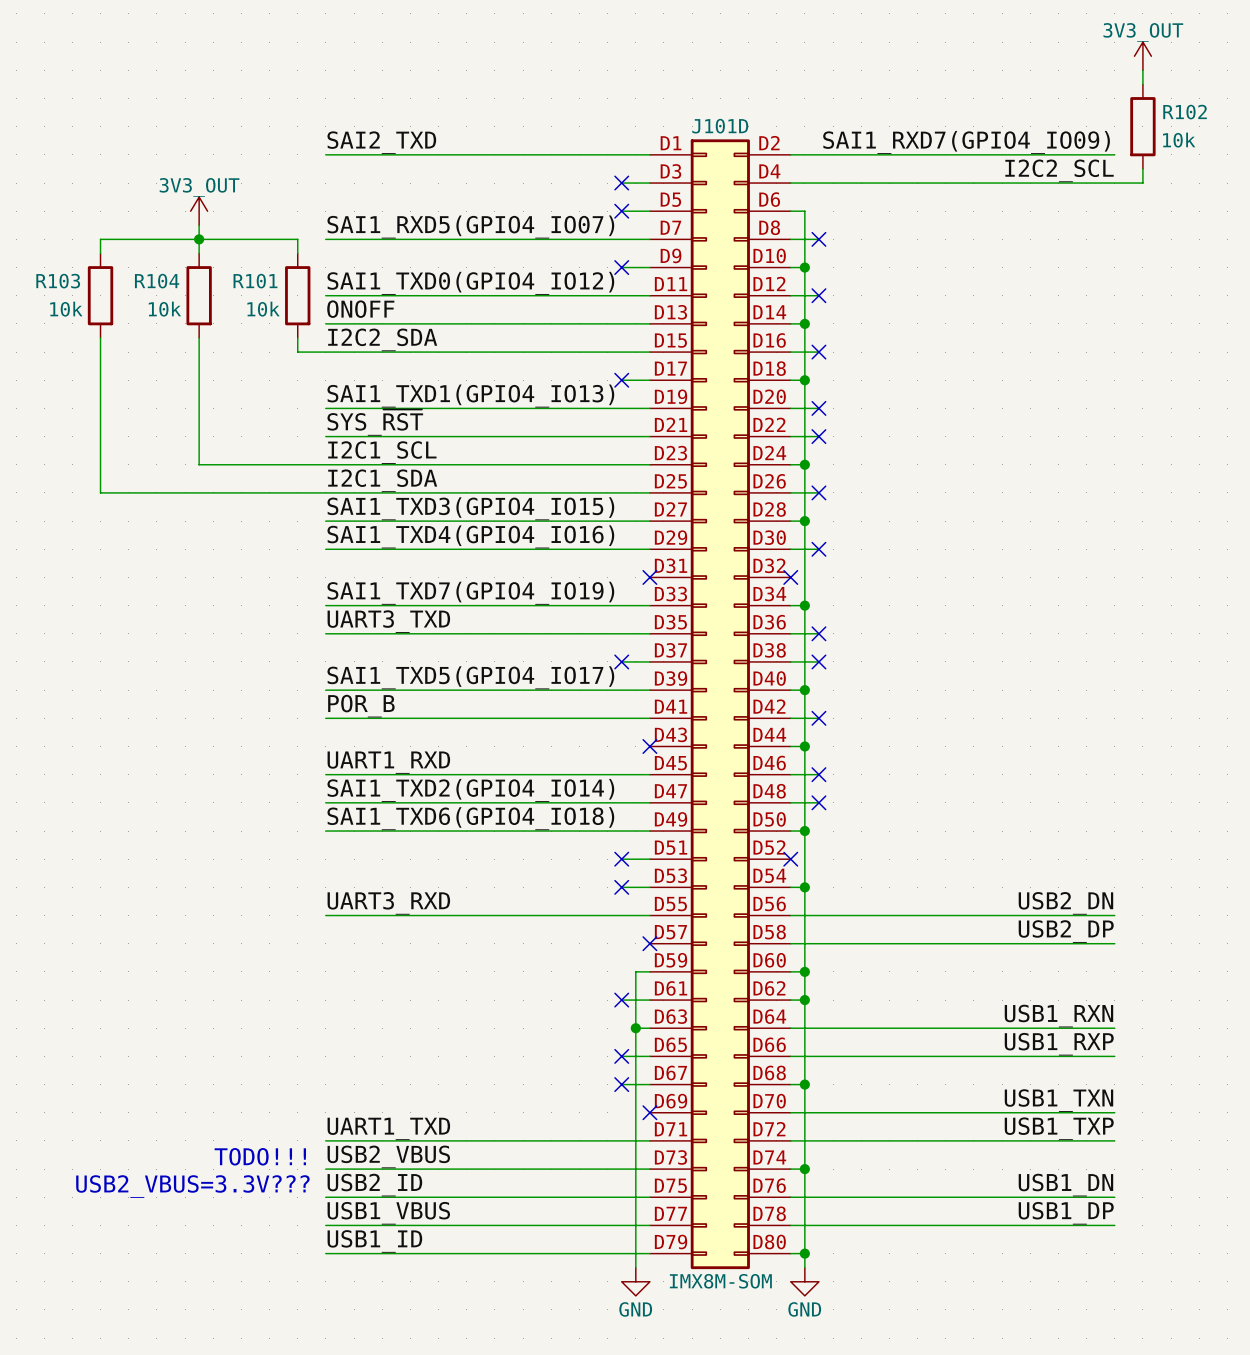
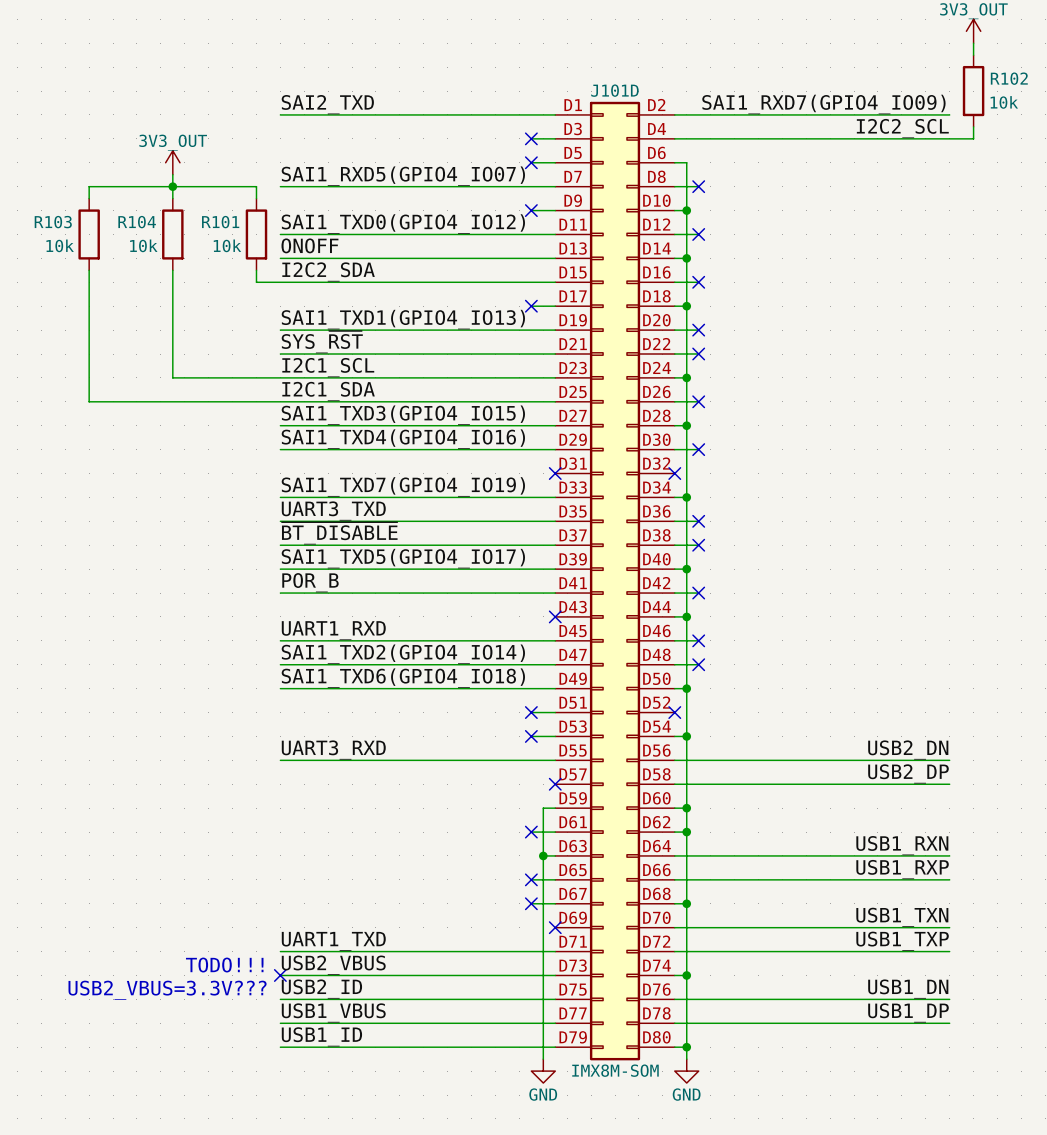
label: none -> ~{BT_DISABLE} (339, 533)
wire: none -> (280, 545) (531, 545)
no-connect mark: (621, 661) -> none
no-connect mark: none -> (280, 975)

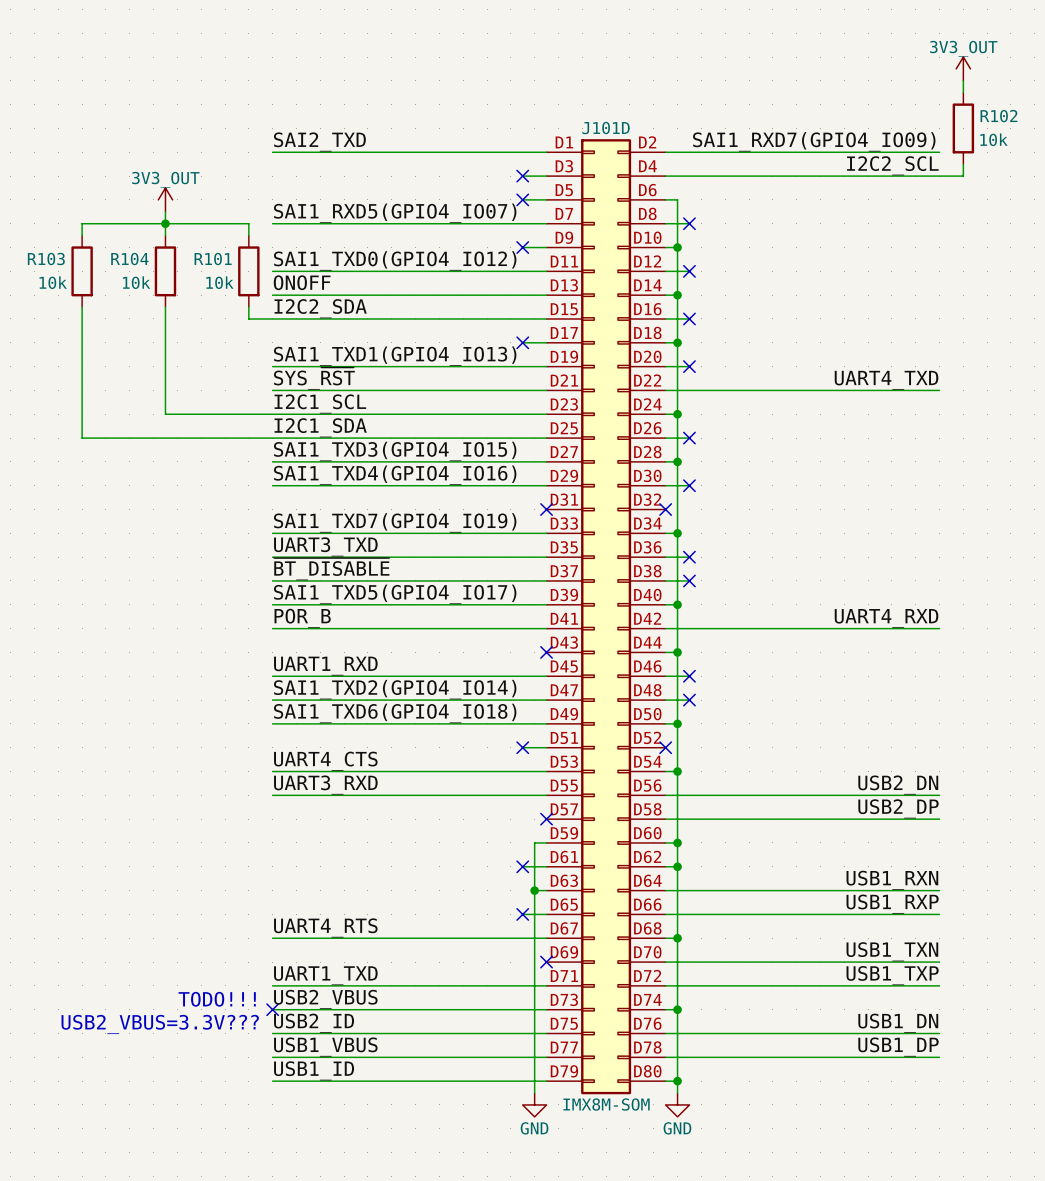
label: none -> UART4_TXD (886, 380)
wire: none -> (689, 390) (939, 390)
no-connect mark: (698, 354) -> none
label: none -> UART4_RXD (886, 618)
wire: none -> (689, 628) (939, 628)
no-connect mark: (698, 593) -> none
label: none -> UART4_CTS (325, 761)
wire: none -> (272, 771) (522, 771)
no-connect mark: (531, 736) -> none
label: none -> UART4_RTS (325, 927)
wire: none -> (272, 938) (522, 938)
no-connect mark: (531, 903) -> none

